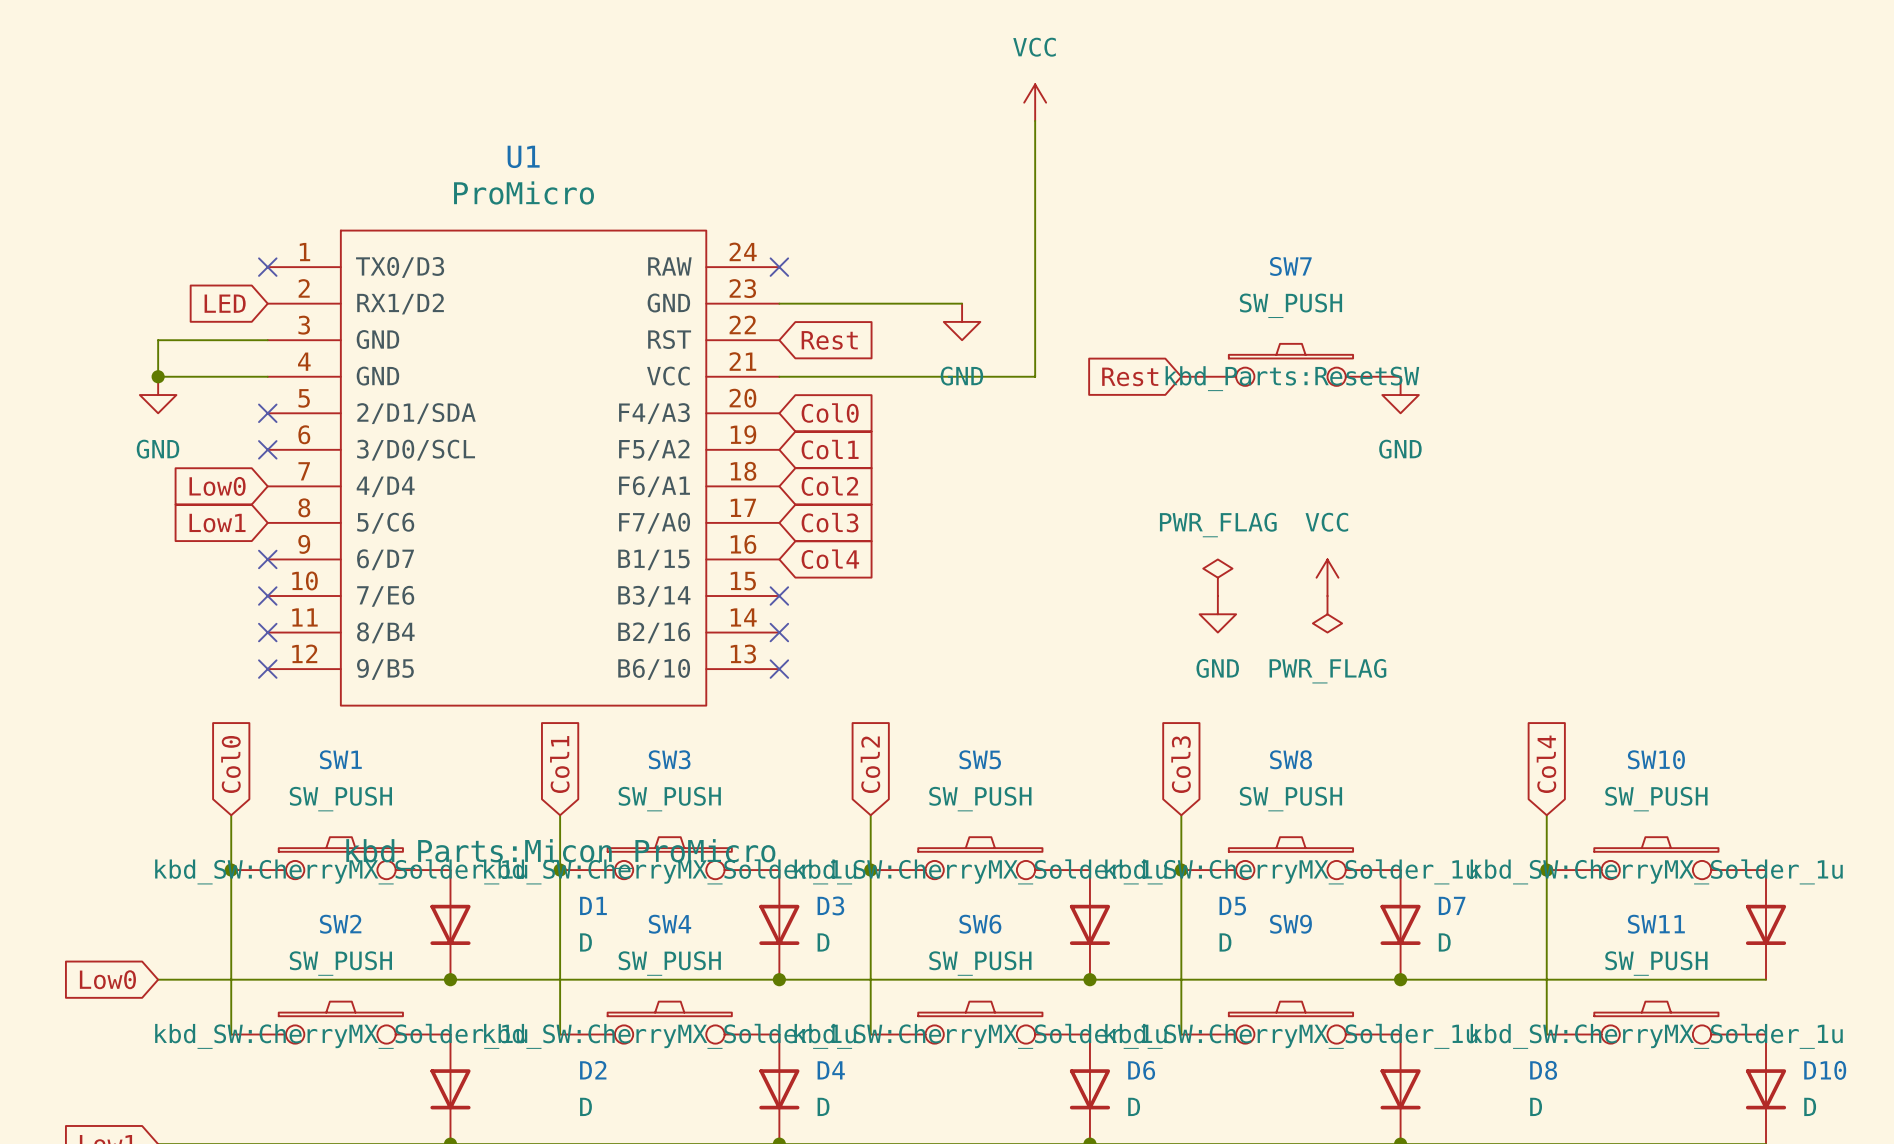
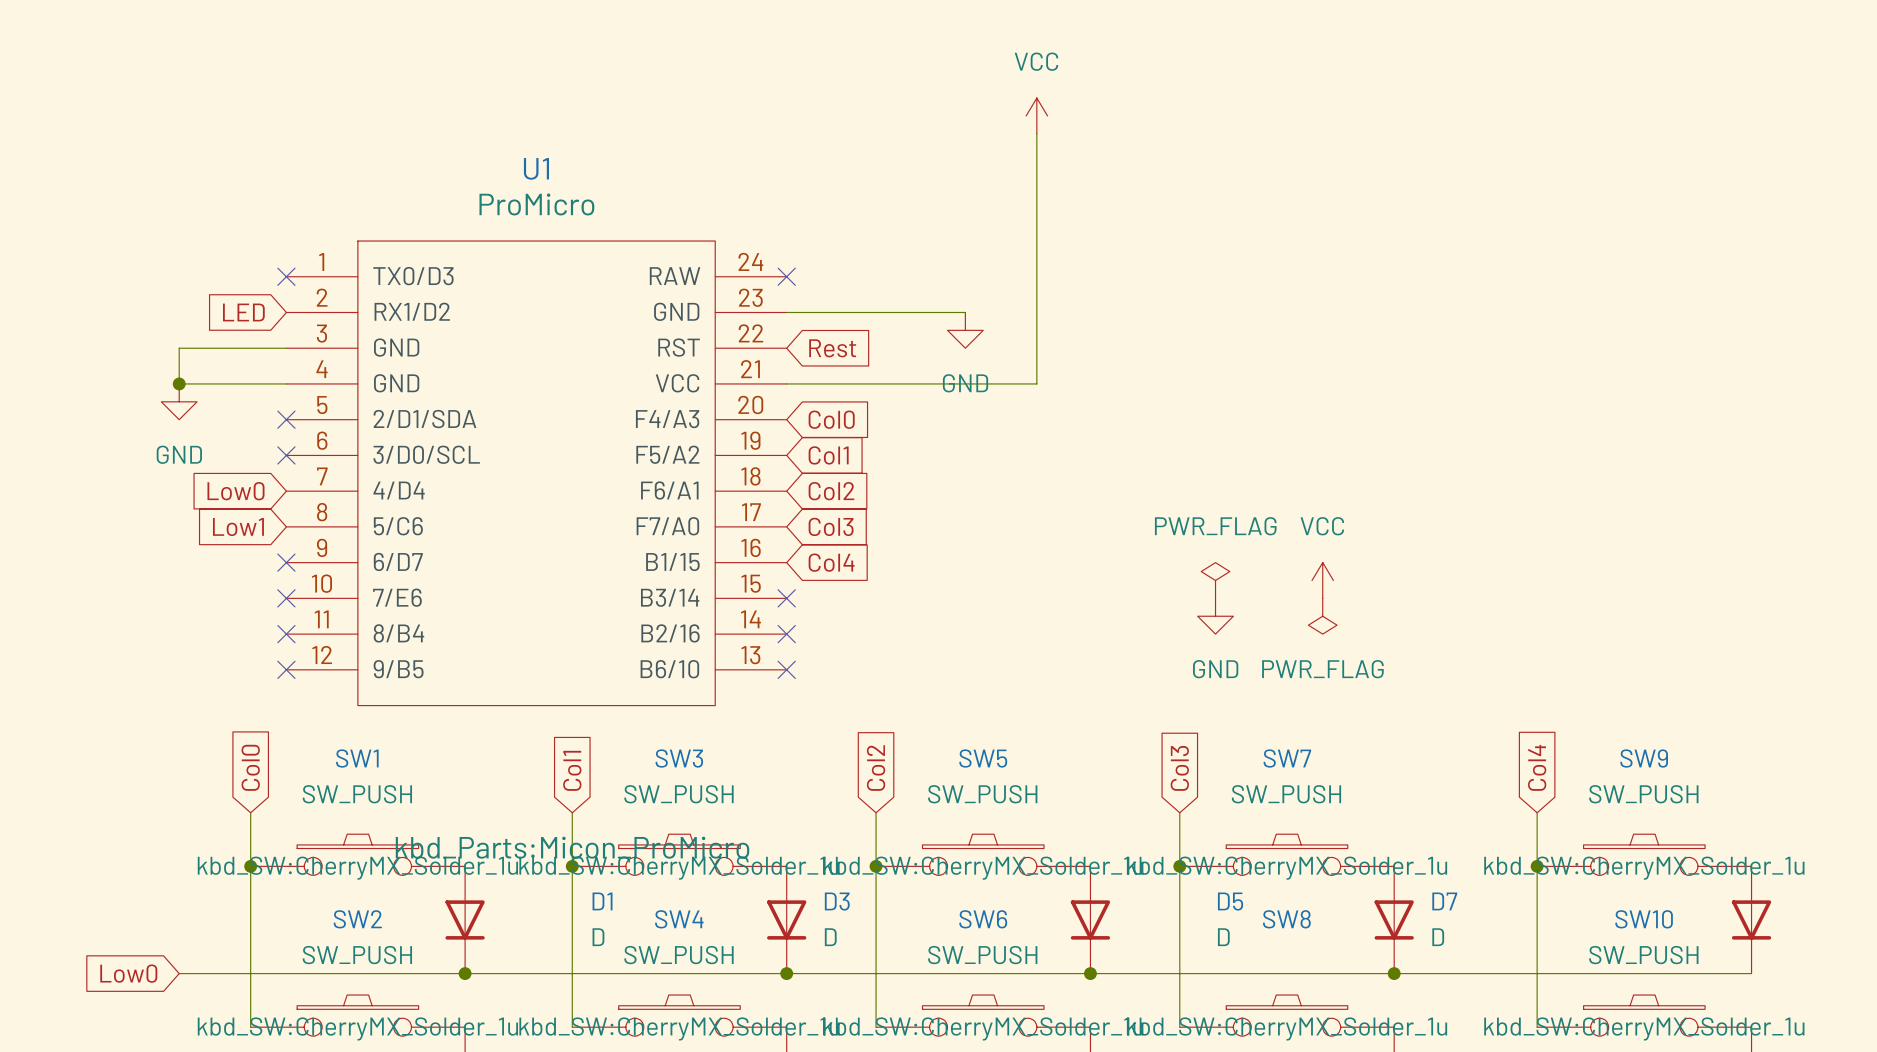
SW7: SW_PUSH (1290, 364) -> none
global label: Rest (1130, 376) -> none
power symbol: GND (1400, 395) -> none
SW8 name: SW8 (1291, 759) -> SW7 (1287, 758)
SW10 name: SW10 (1656, 759) -> SW9 (1644, 758)
SW9 name: SW9 (1290, 924) -> SW8 (1286, 919)
SW11 name: SW11 (1656, 924) -> SW10 (1644, 919)

